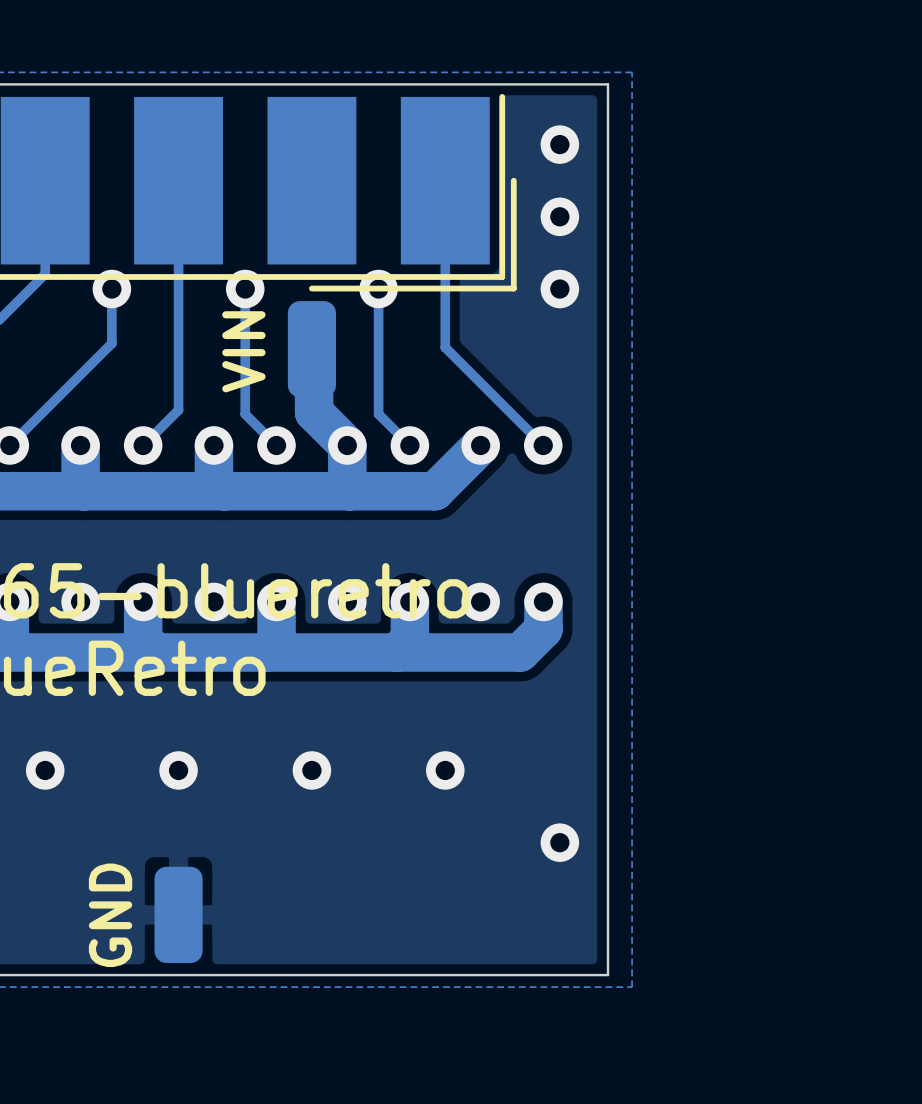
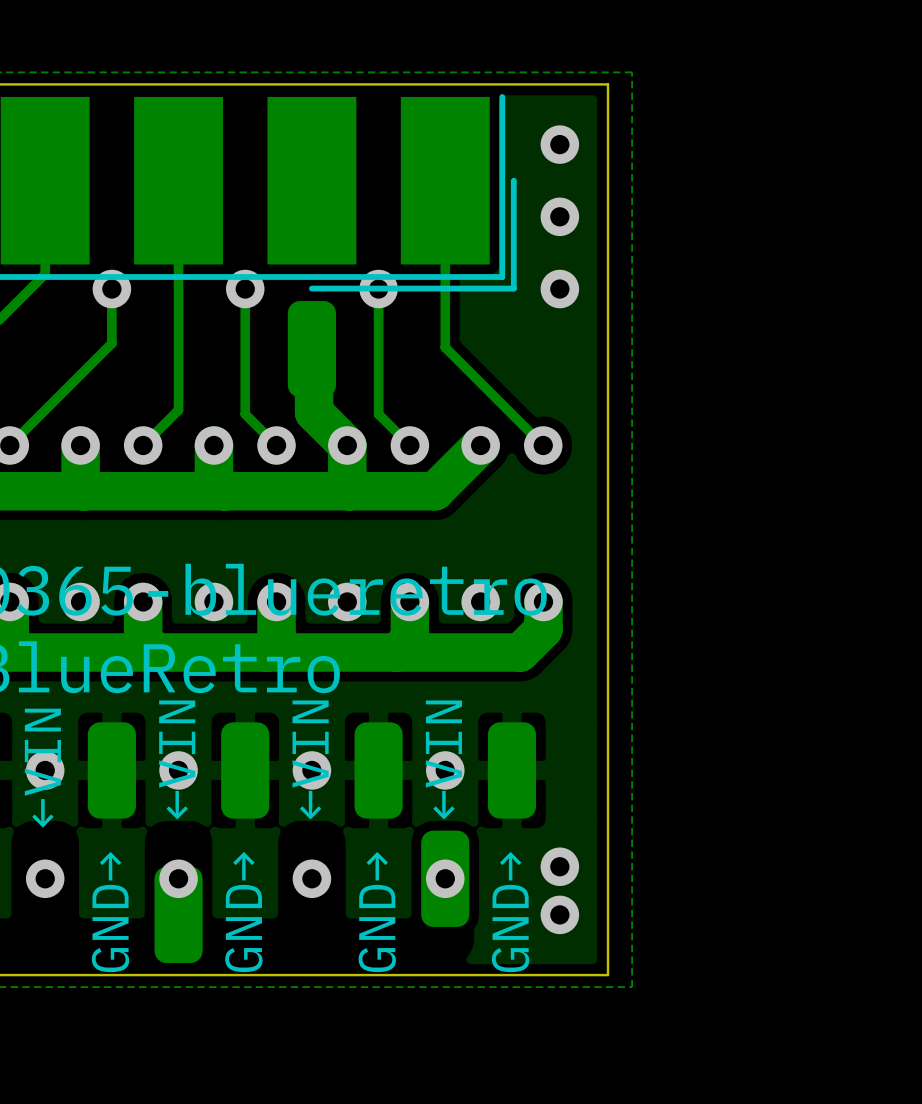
text: VIN (243, 351) -> none
text: none -> ←VIN (177, 759)
text: none -> ←VIN (310, 759)
text: none -> ←VIN (443, 759)
text: none -> ←VIN (42, 768)
part: none -> (111, 770)
part: none -> (245, 770)
part: none -> (378, 770)
part: none -> (511, 770)
via position: (559, 842) -> (559, 866)
via: none -> (45, 878)
via: none -> (178, 878)
via: none -> (311, 878)
part: none -> (445, 878)
via: none -> (445, 878)
text: none -> GND→ (243, 912)
text: none -> GND→ (377, 912)
text: none -> GND→ (510, 912)
via: none -> (559, 914)
text: GND (110, 915) -> GND→ (110, 912)

